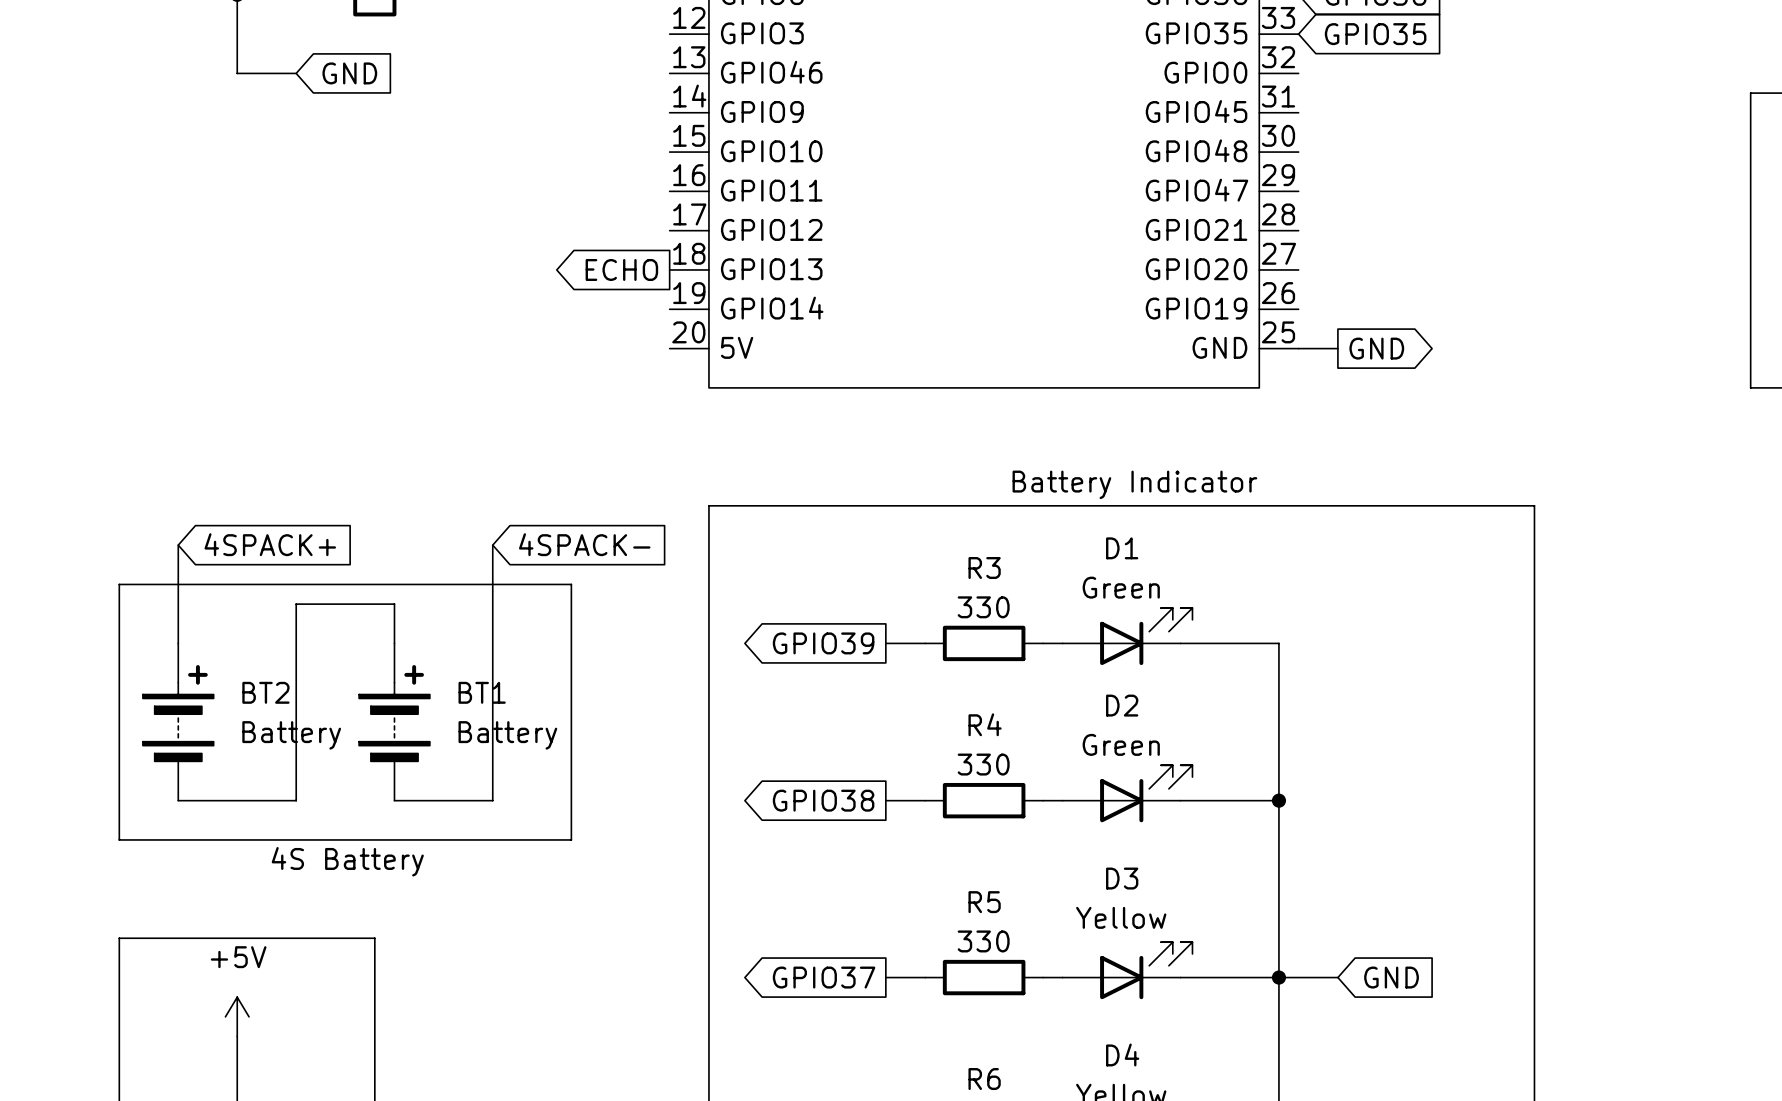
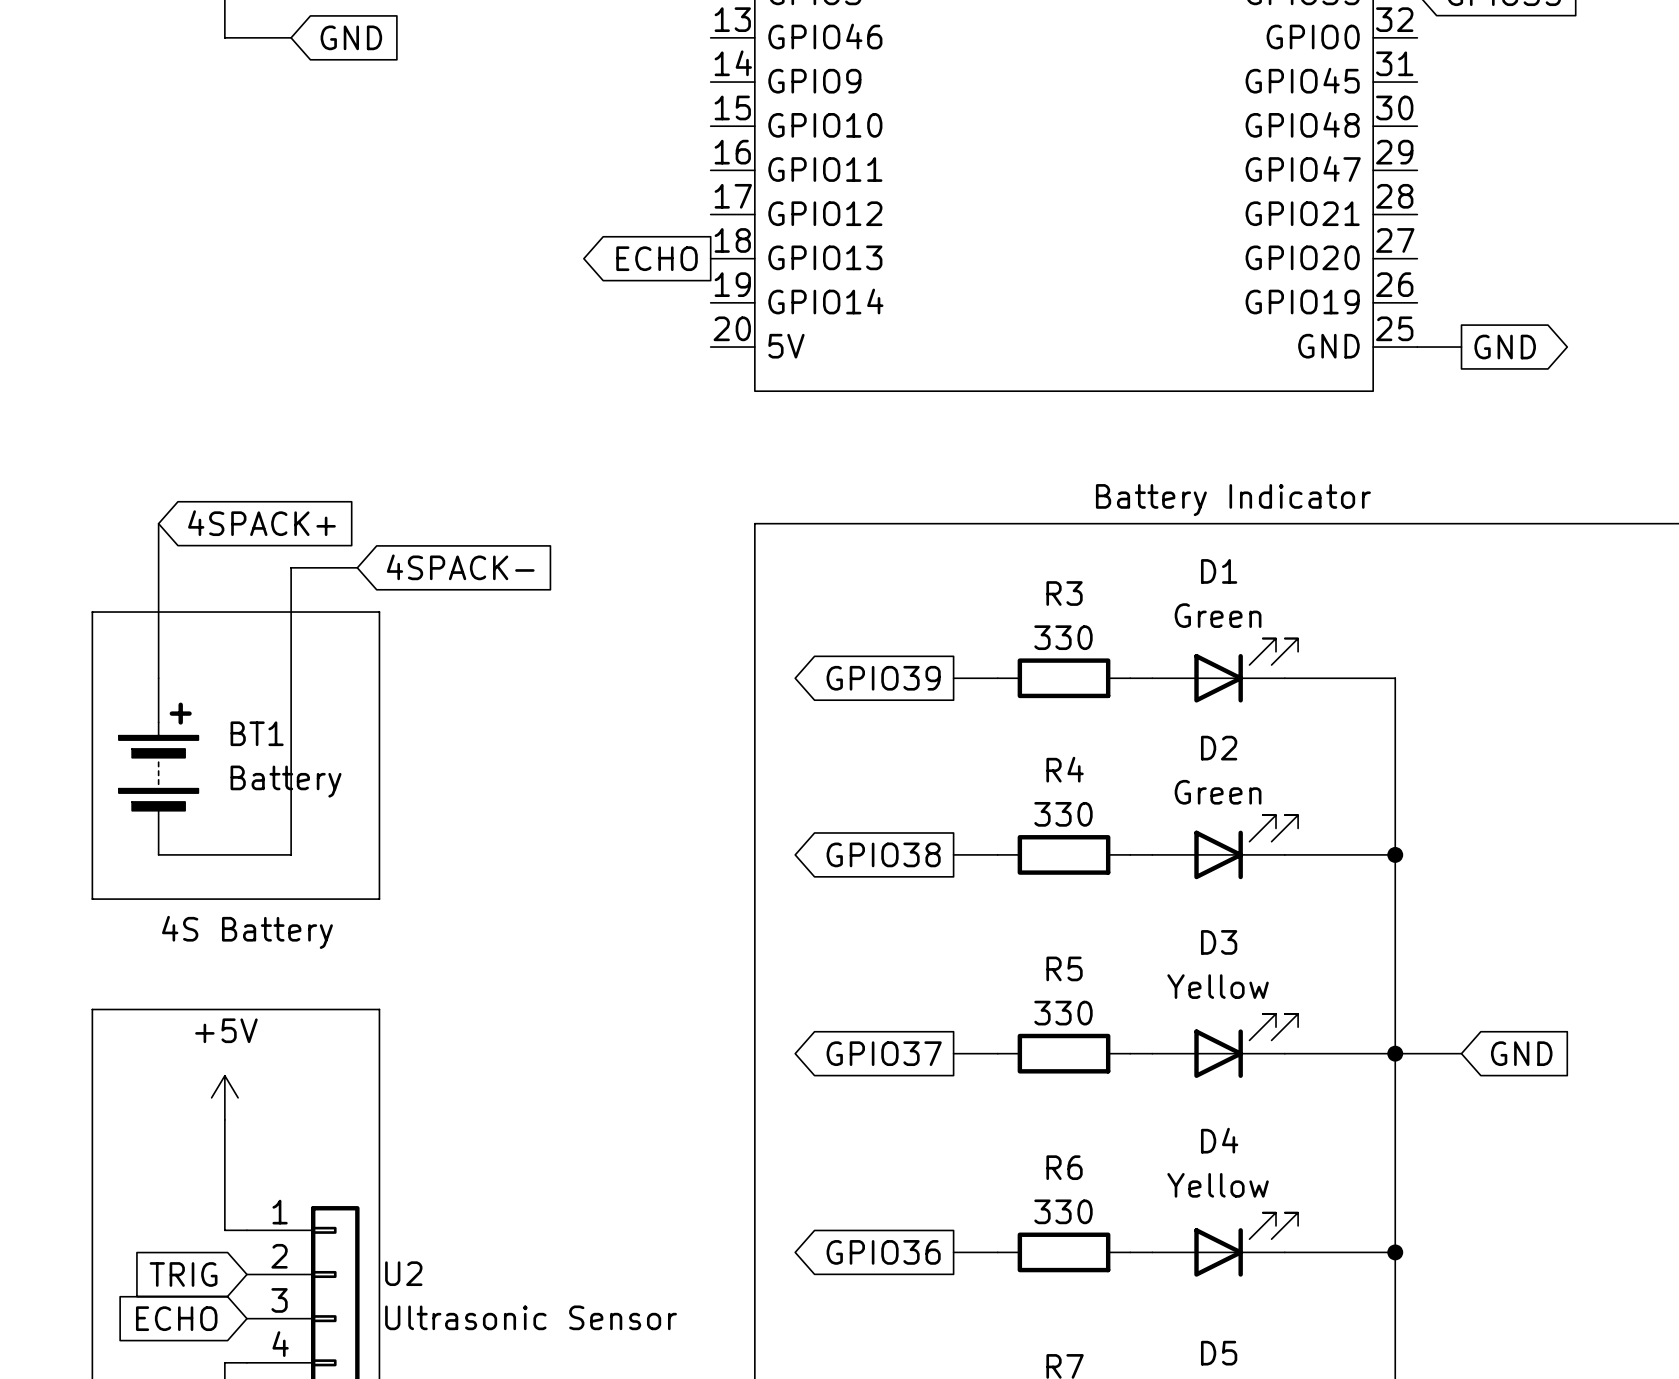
wire: none -> (158, 523) (158, 567)
global label position: 4SPACK+ (270, 544) -> 4SPACK+ (261, 523)
global label position: 4SPACK- (584, 544) -> 4SPACK- (460, 567)
wire: (492, 545) (492, 800) (394, 800) -> none
line: (374, 584) (571, 584) (571, 839) (374, 839) -> (379, 612) (379, 899)
wire: (296, 604) (394, 604) (394, 643) -> (291, 634) (291, 567) (357, 567)
BT2 name: BT2 (265, 692) -> BT1 (257, 733)
BT1: Battery (394, 722) -> none
text position: 4S Battery (347, 861) -> 4S Battery (247, 932)

